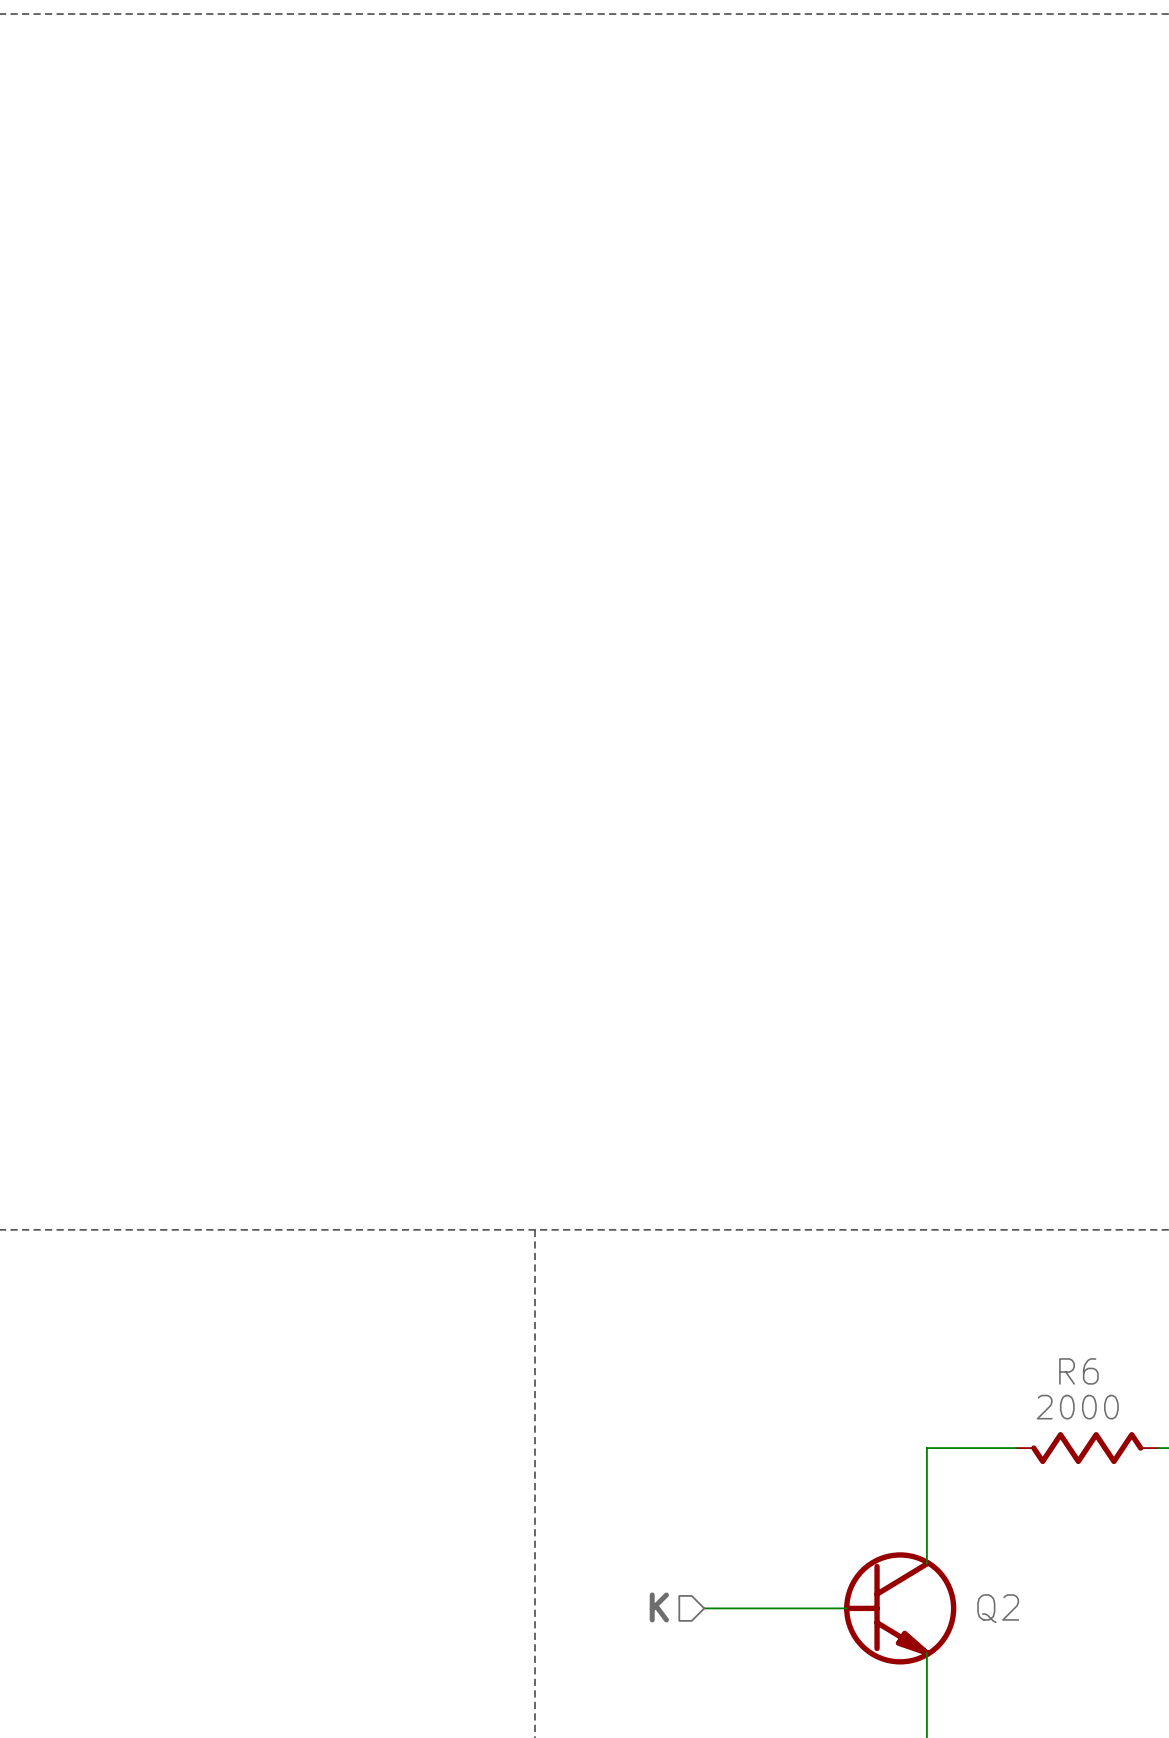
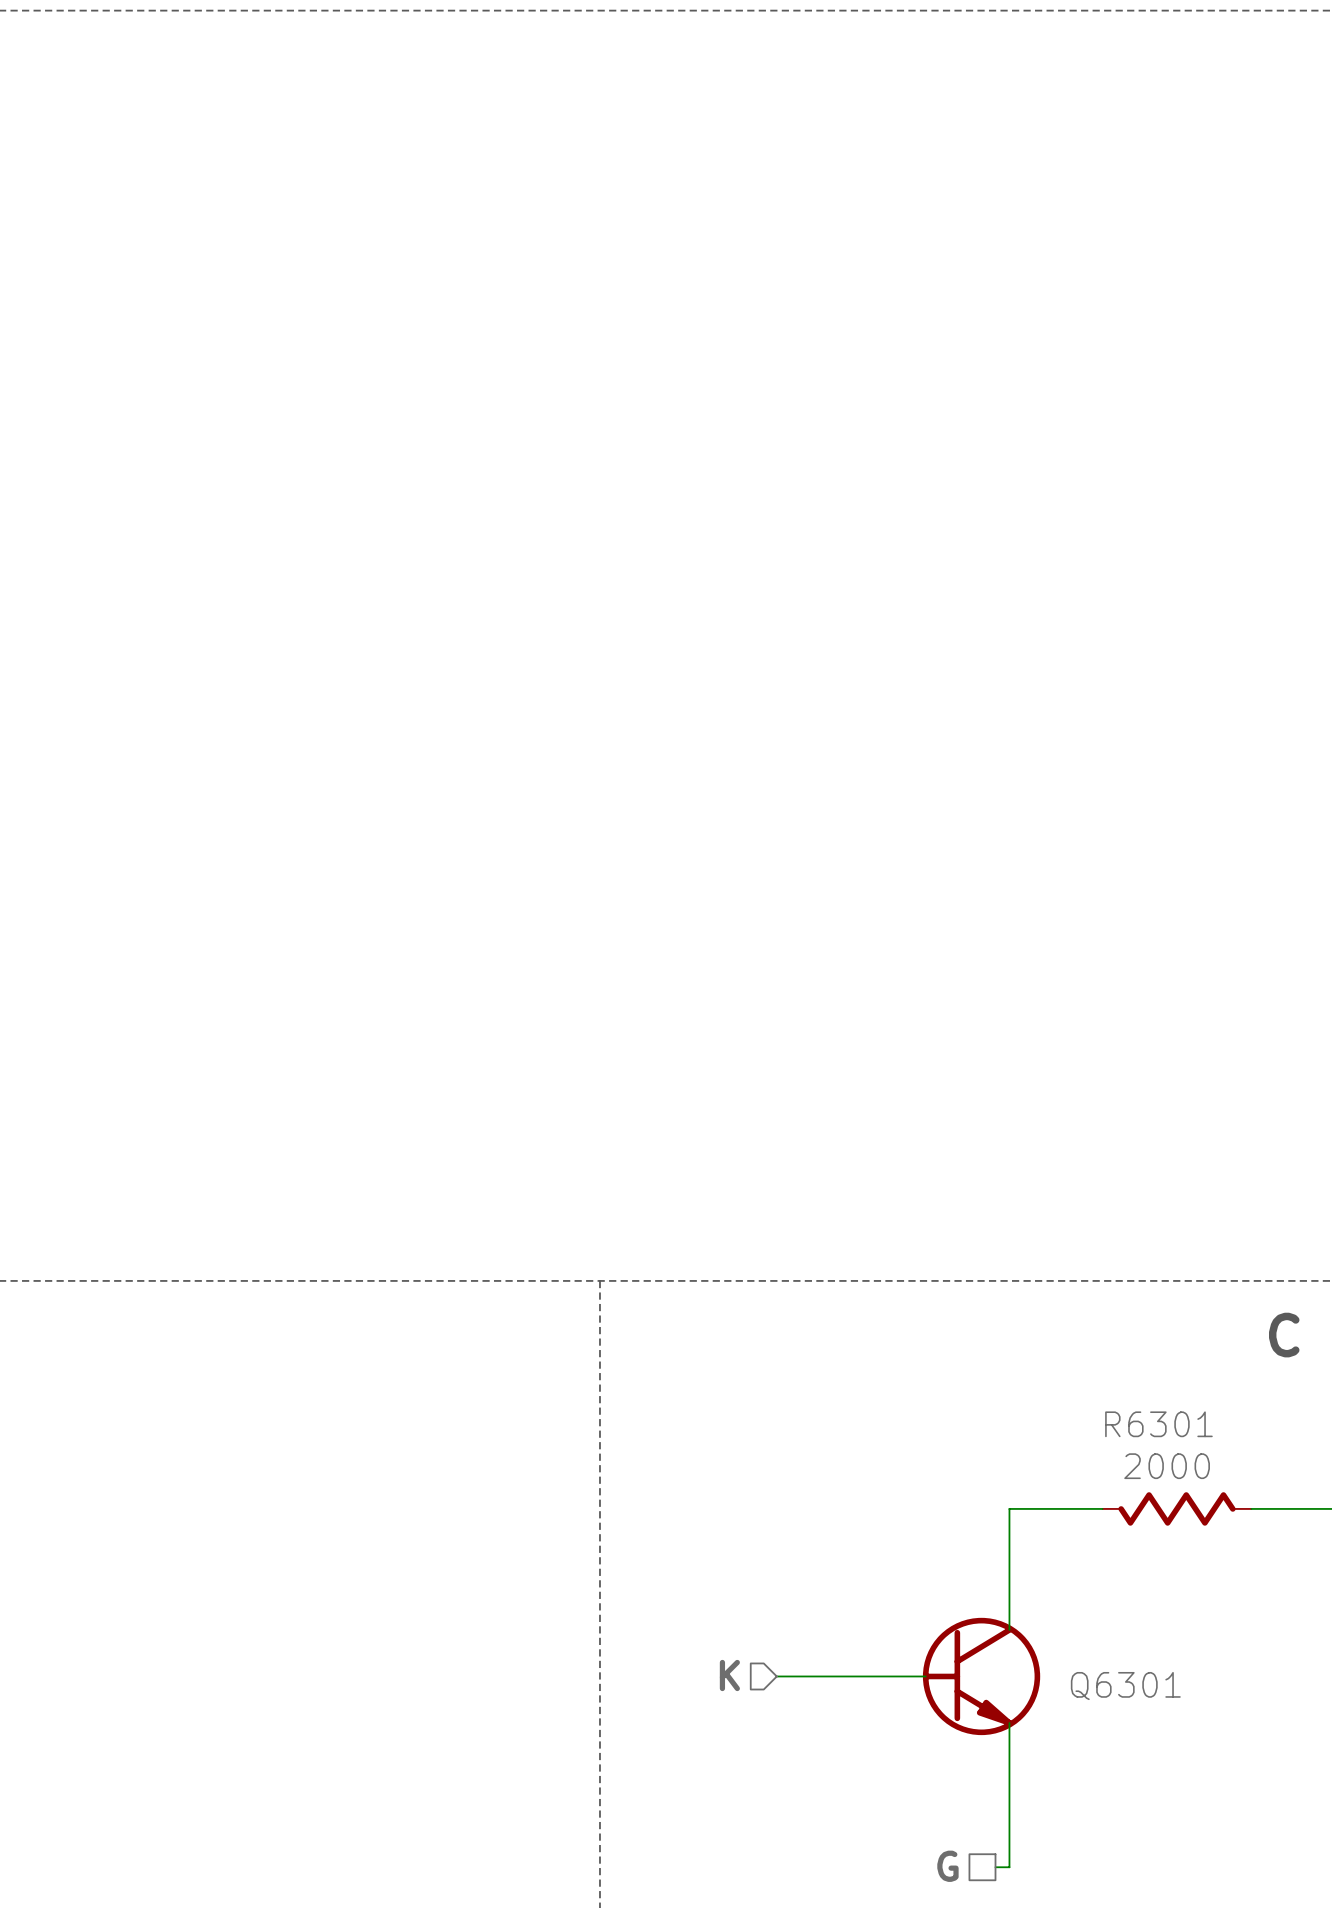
R6301 name: none -> R6301 (1158, 1424)
R6301 text: R6 (1078, 1371) -> none
Q6301 text: Q2 (998, 1608) -> none
Q6301 name: none -> Q6301 (1125, 1686)

